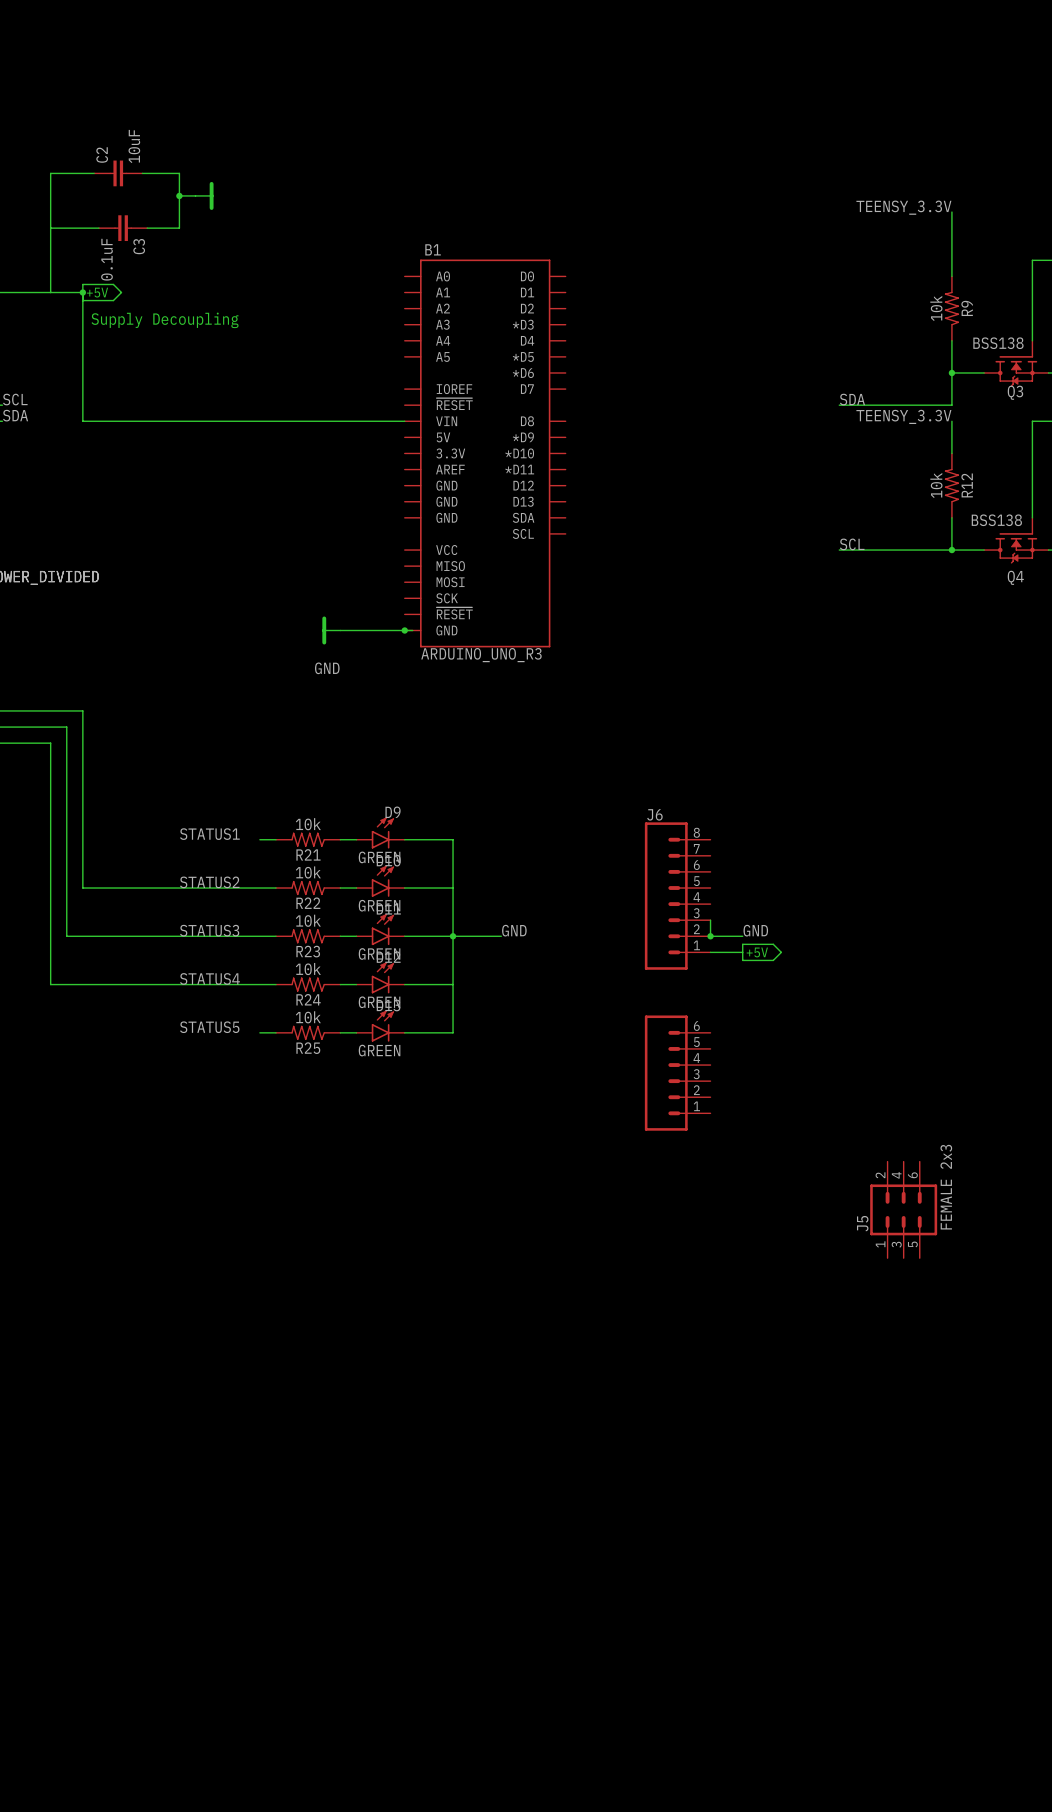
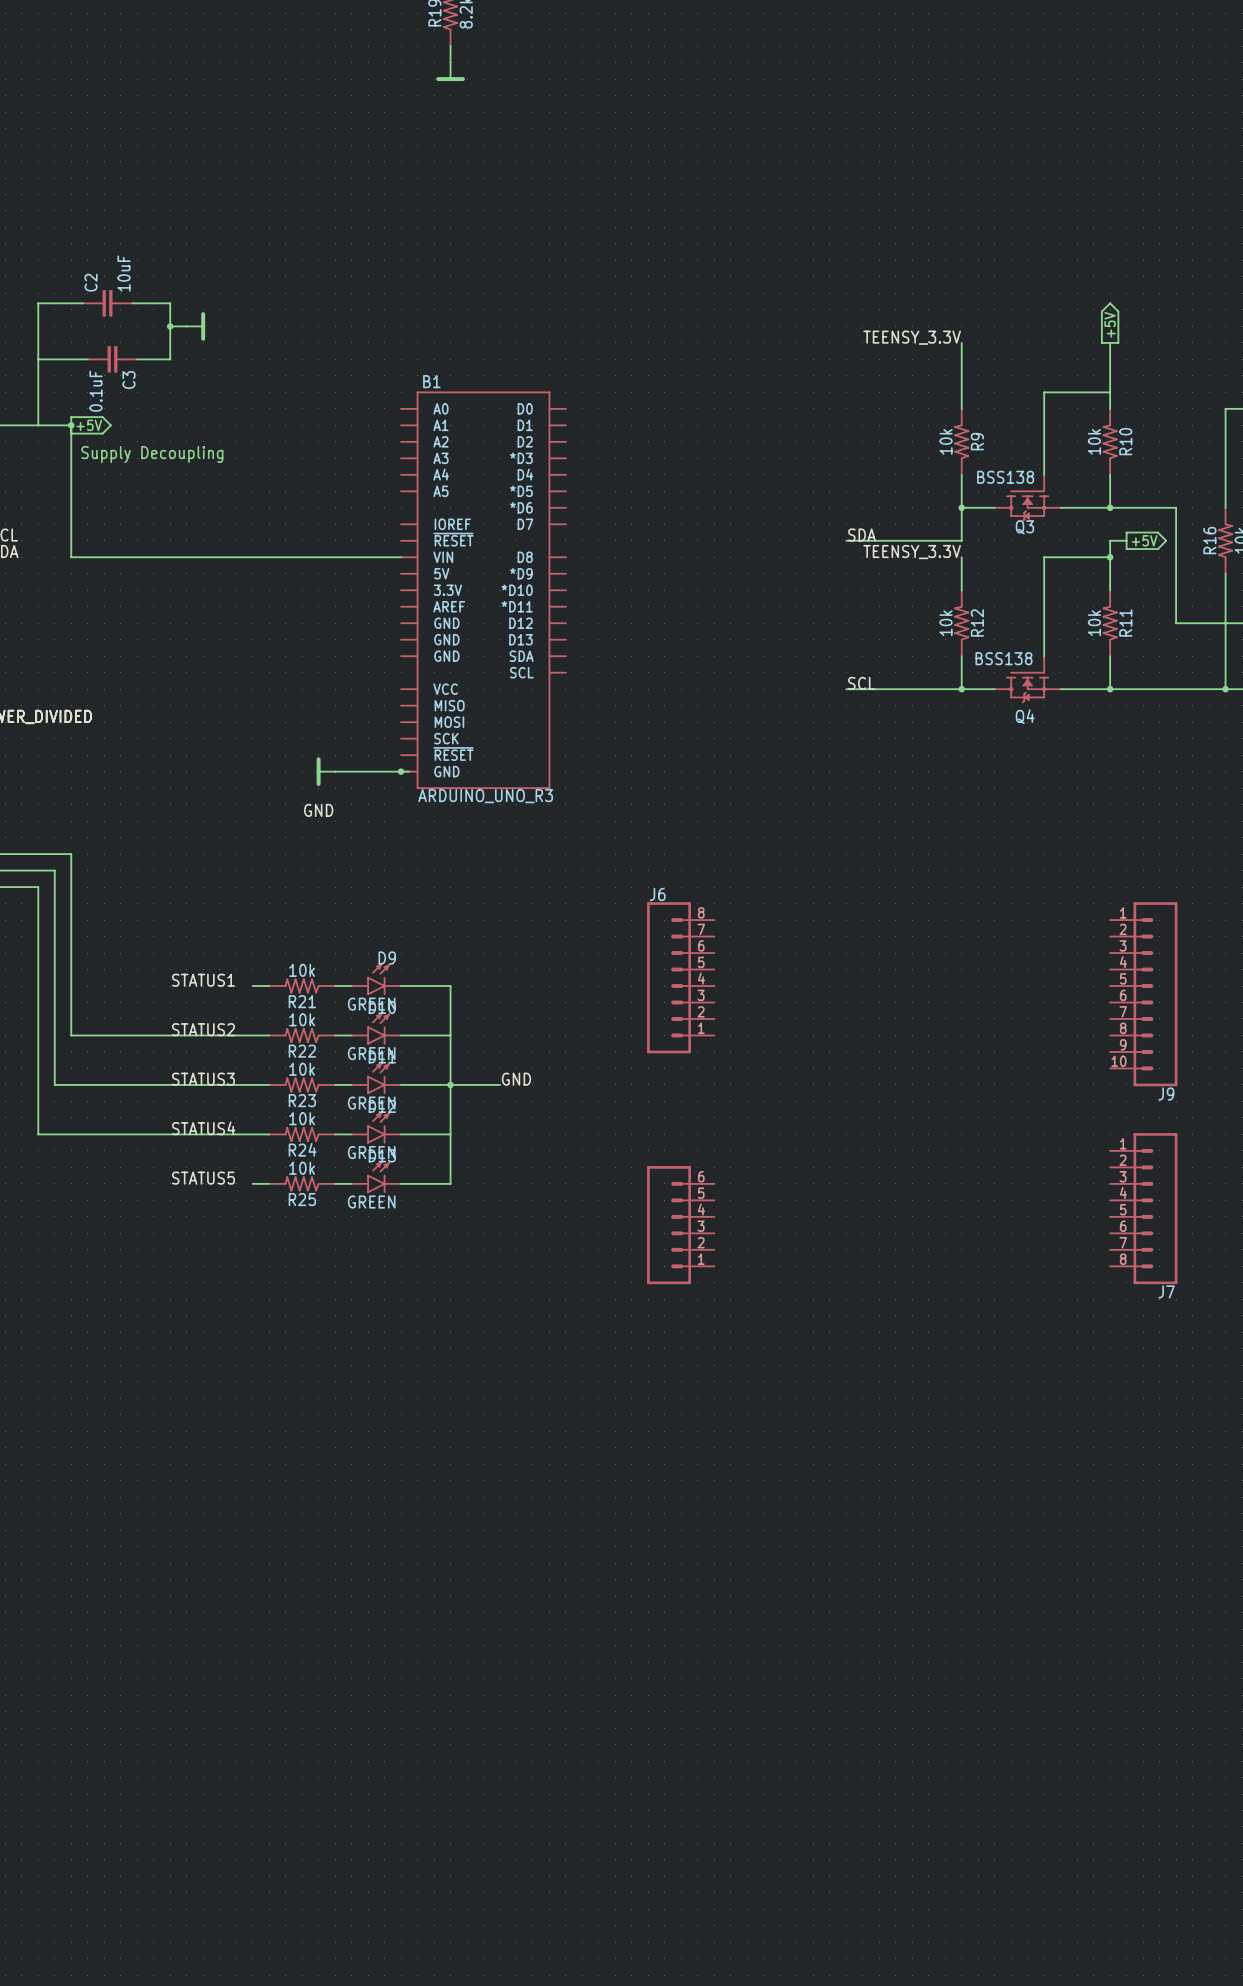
J6 position: (677, 896) -> (680, 977)
wire: (710, 920) (710, 936) (742, 936) -> none
label: GND (755, 930) -> none
junction: (710, 936) -> none
wire: (710, 952) (742, 952) -> none
power symbol: (762, 952) -> none
J5: FEMALE 2x3 (903, 1209) -> none

